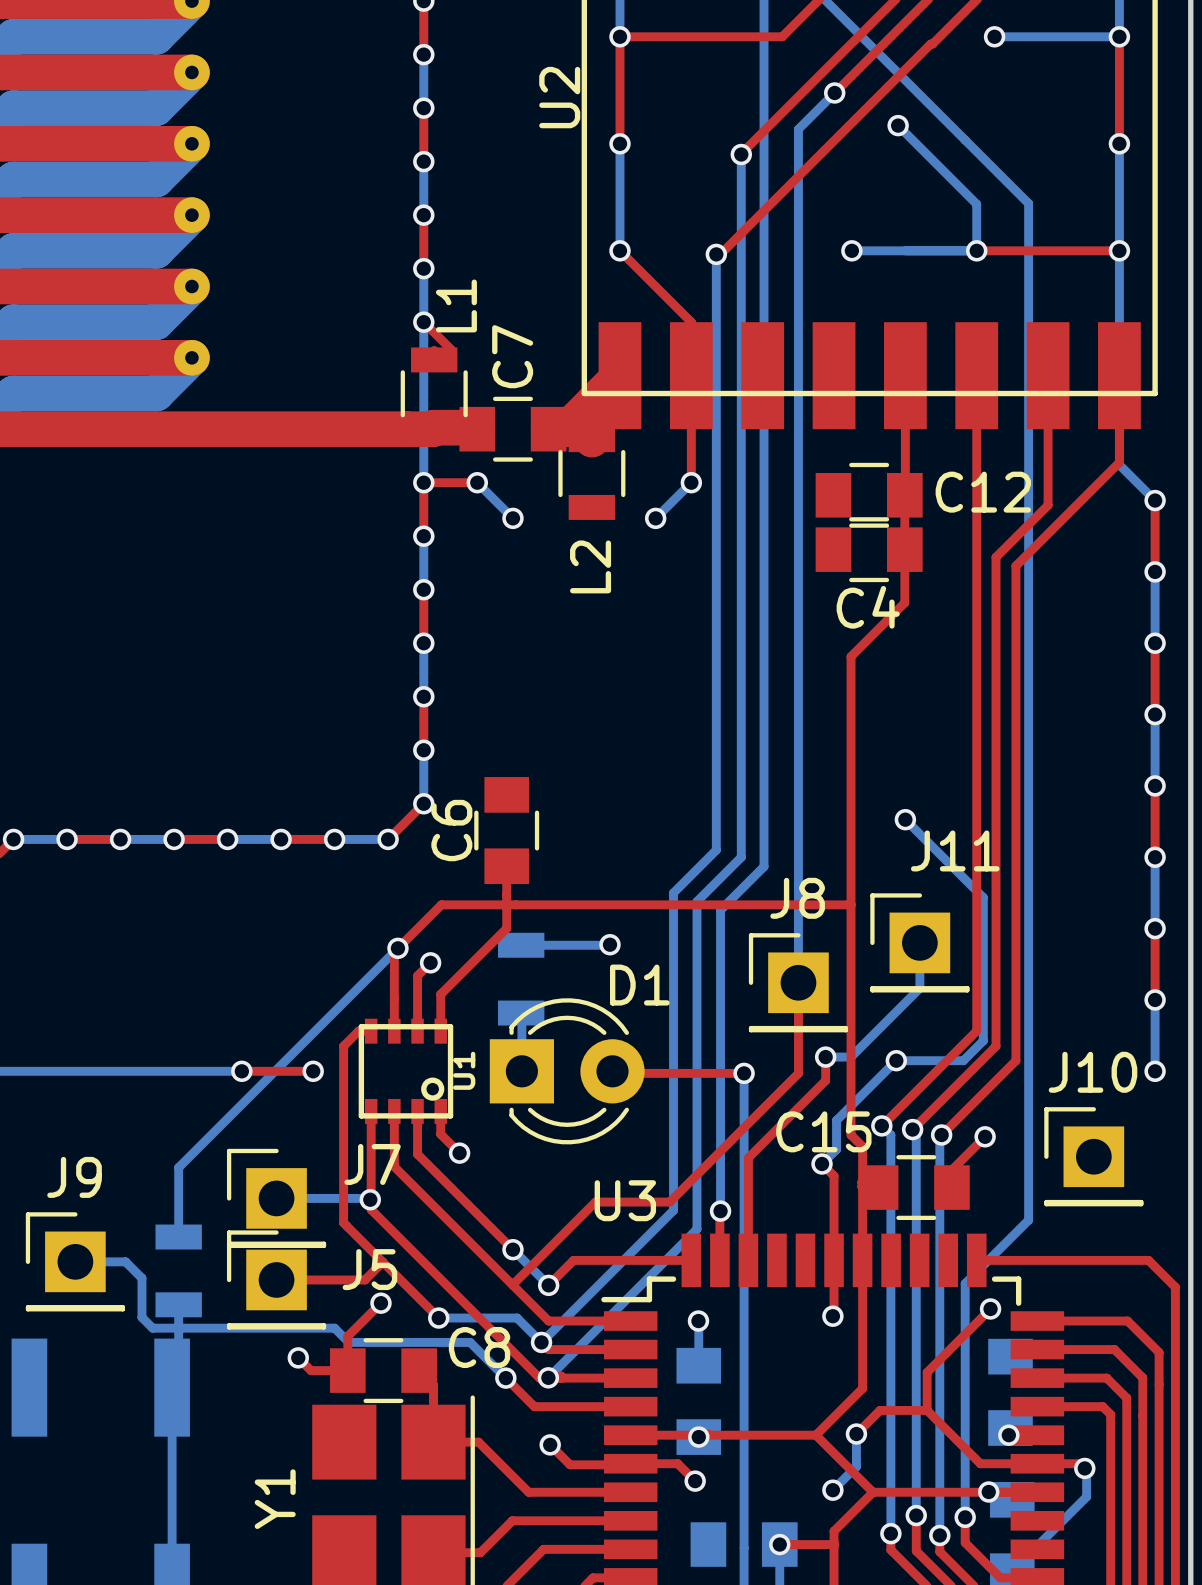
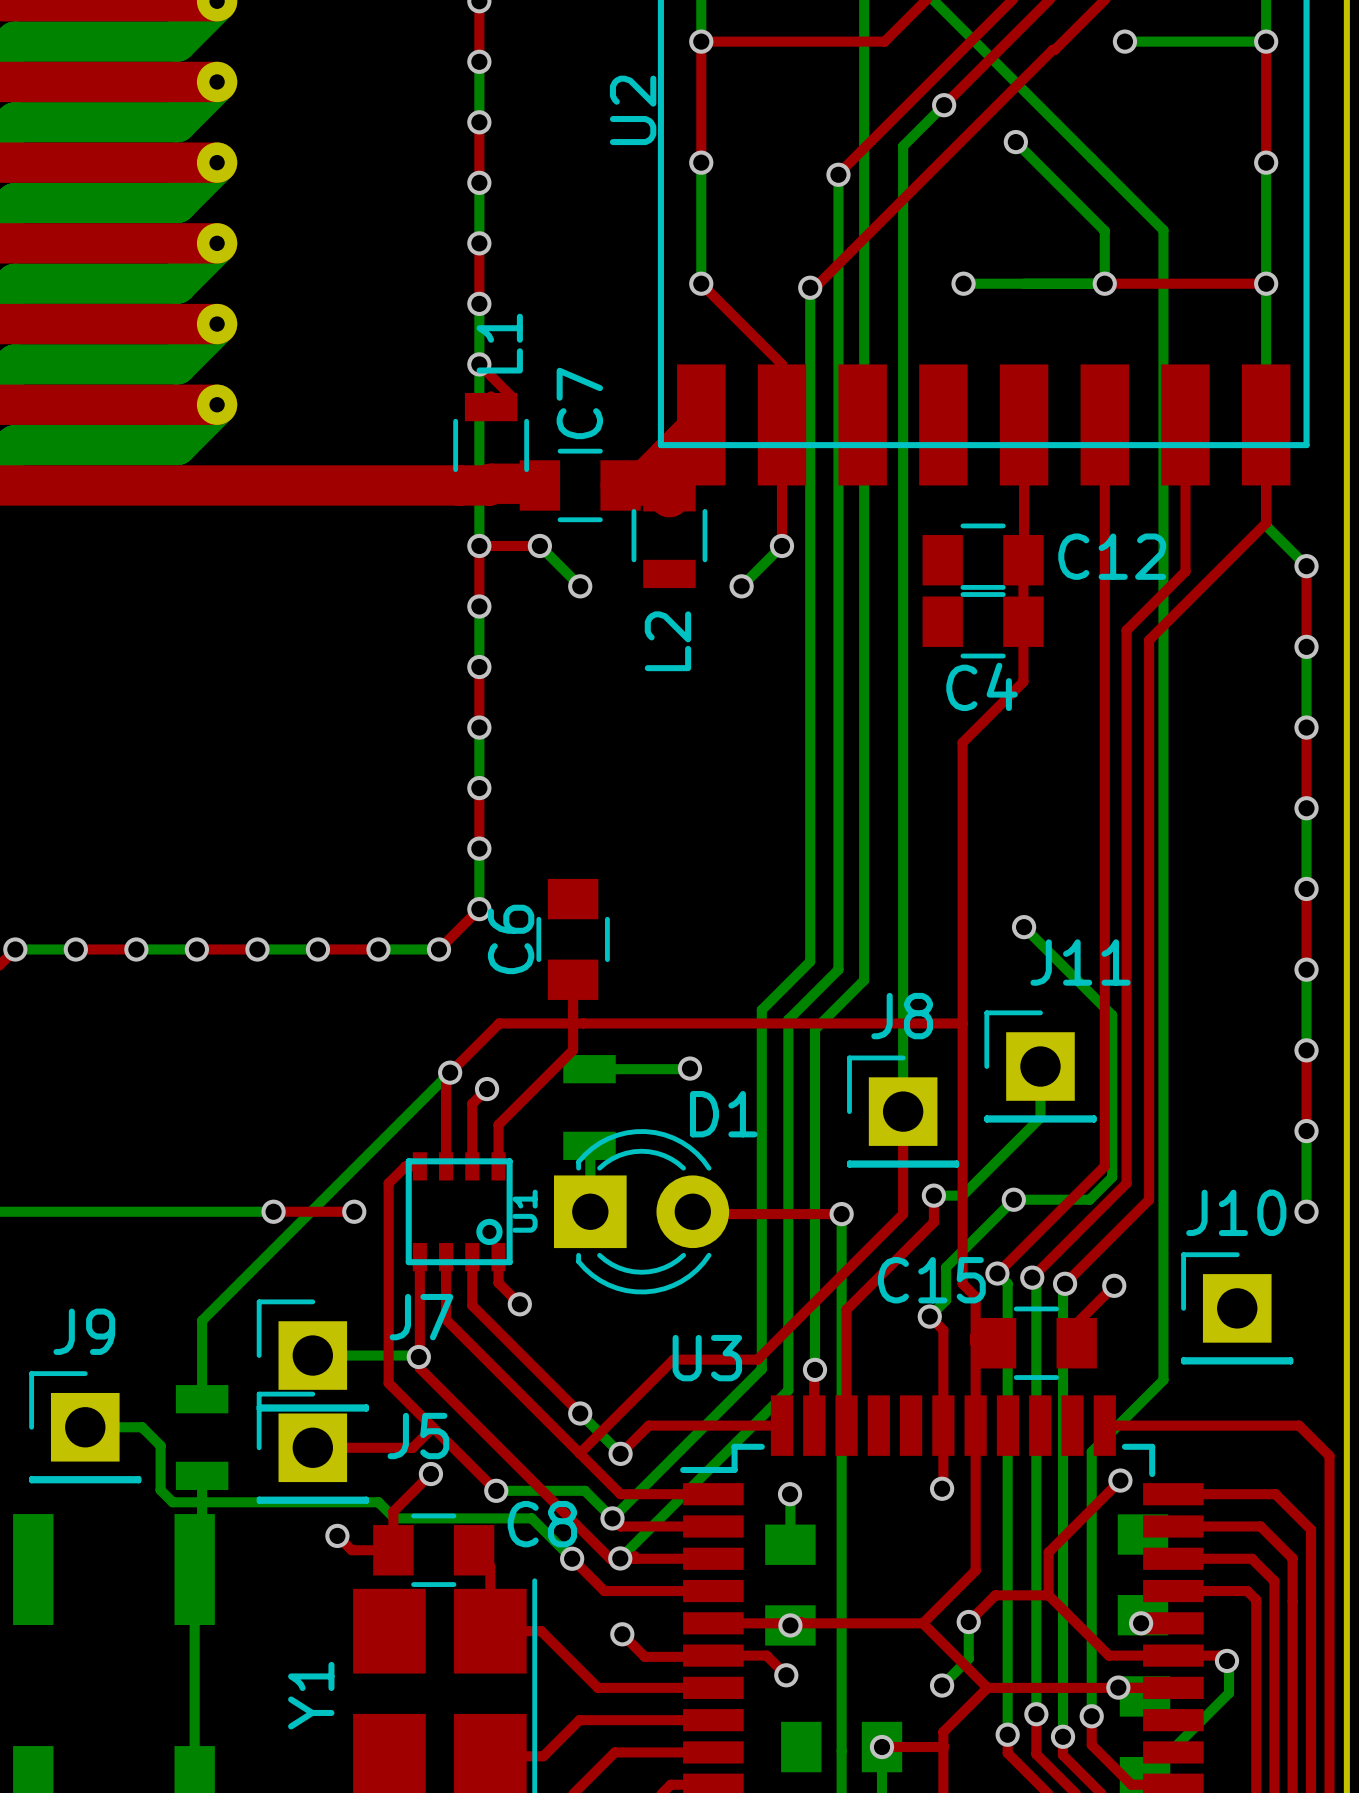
L1 name position: L1 (456, 305) -> L1 (499, 343)

